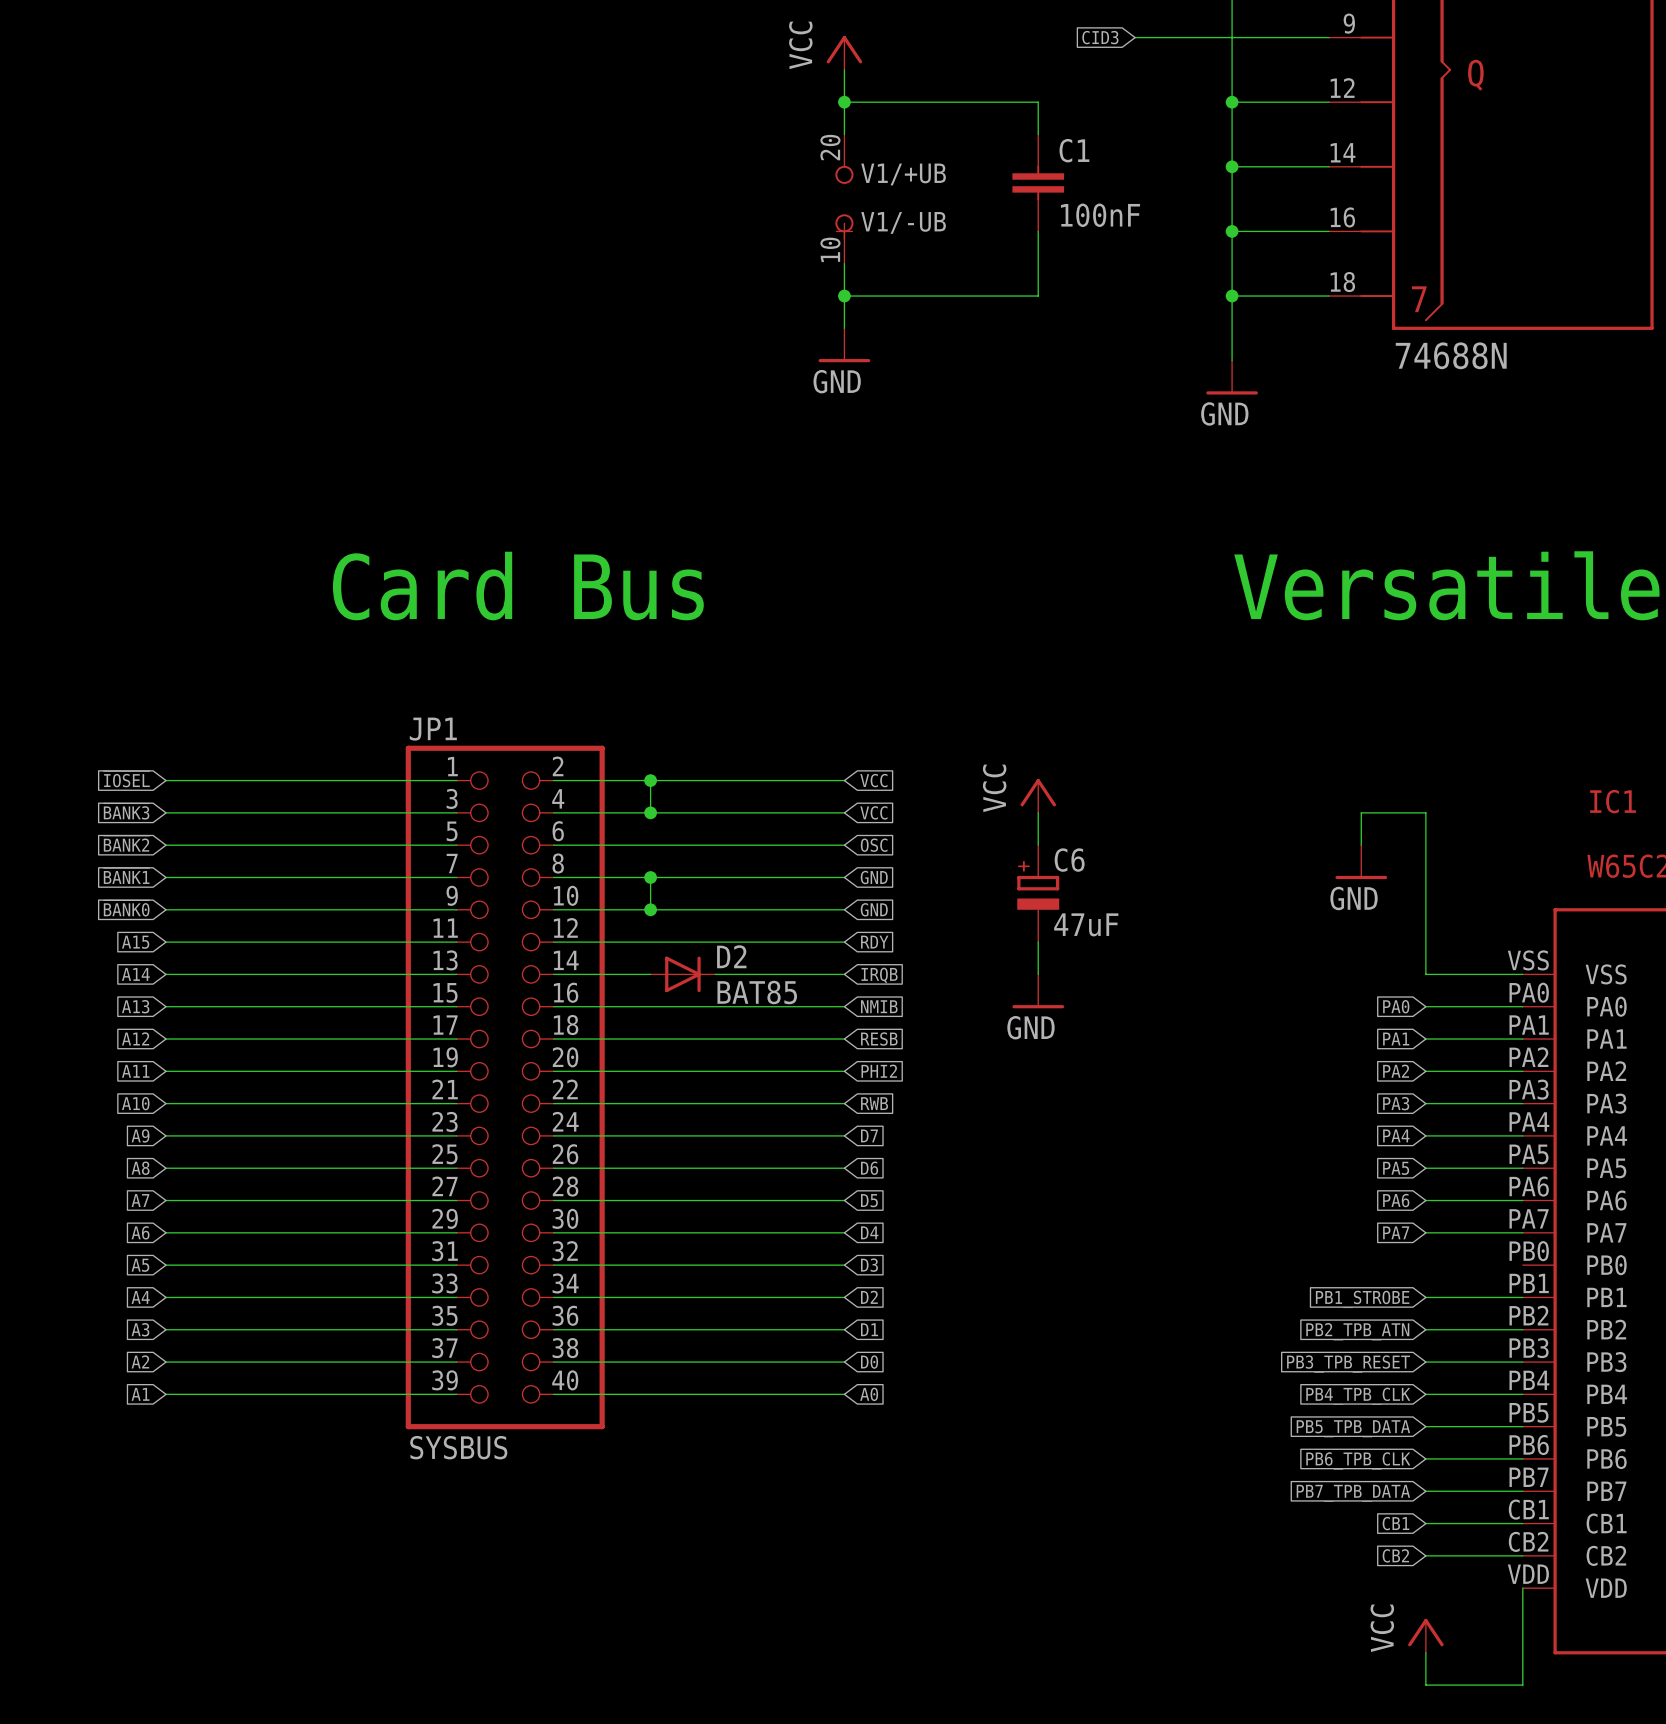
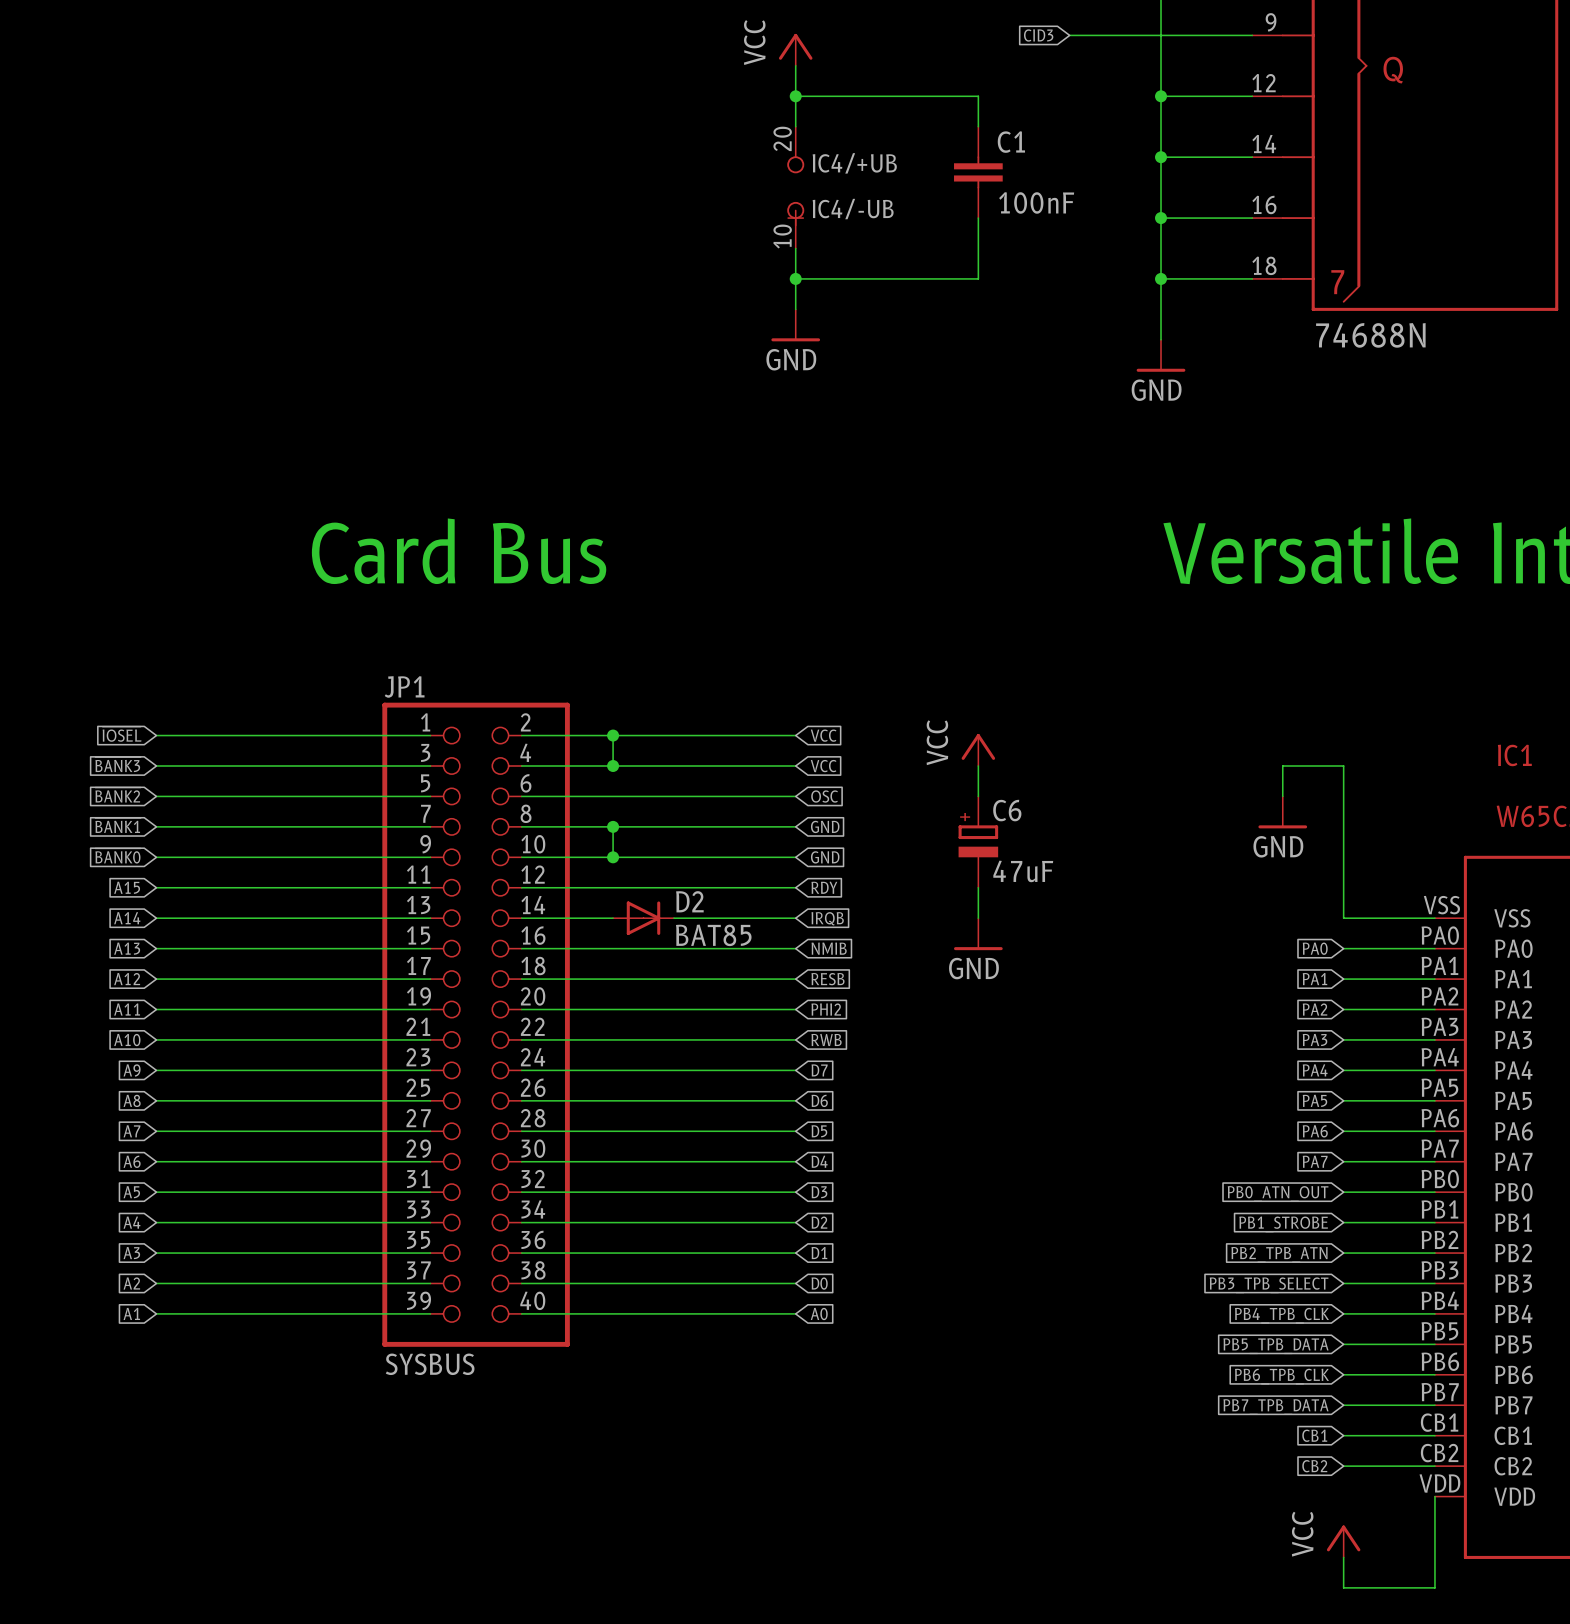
V1/+UB name: V1/+UB (903, 174) -> IC4/+UB (854, 163)
V1/-UB name: V1/-UB (903, 222) -> IC4/-UB (853, 209)
wire: none -> (1343, 1192) (1434, 1192)
global label: none -> PB0_ATN_OUT (1278, 1193)
global label: PB3_TPB_RESET (1348, 1364) -> PB3_TPB_SELECT (1269, 1285)

